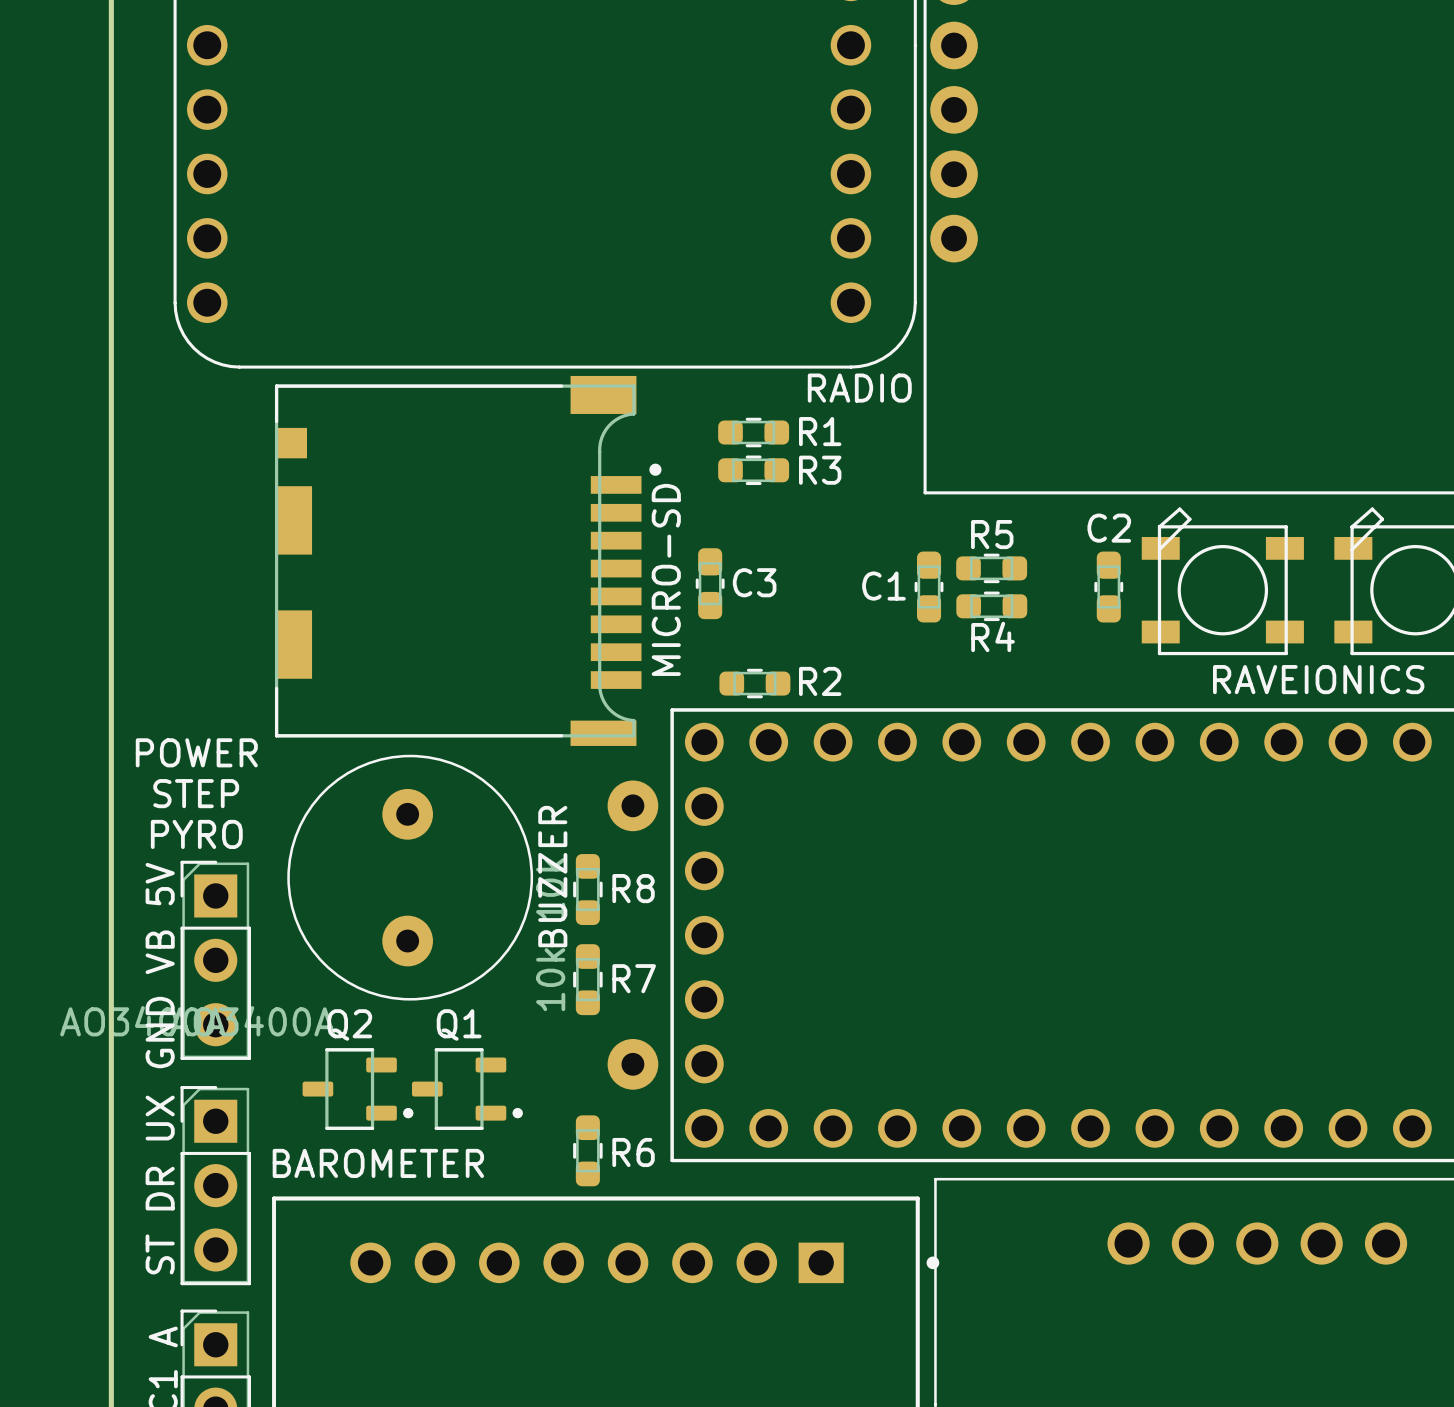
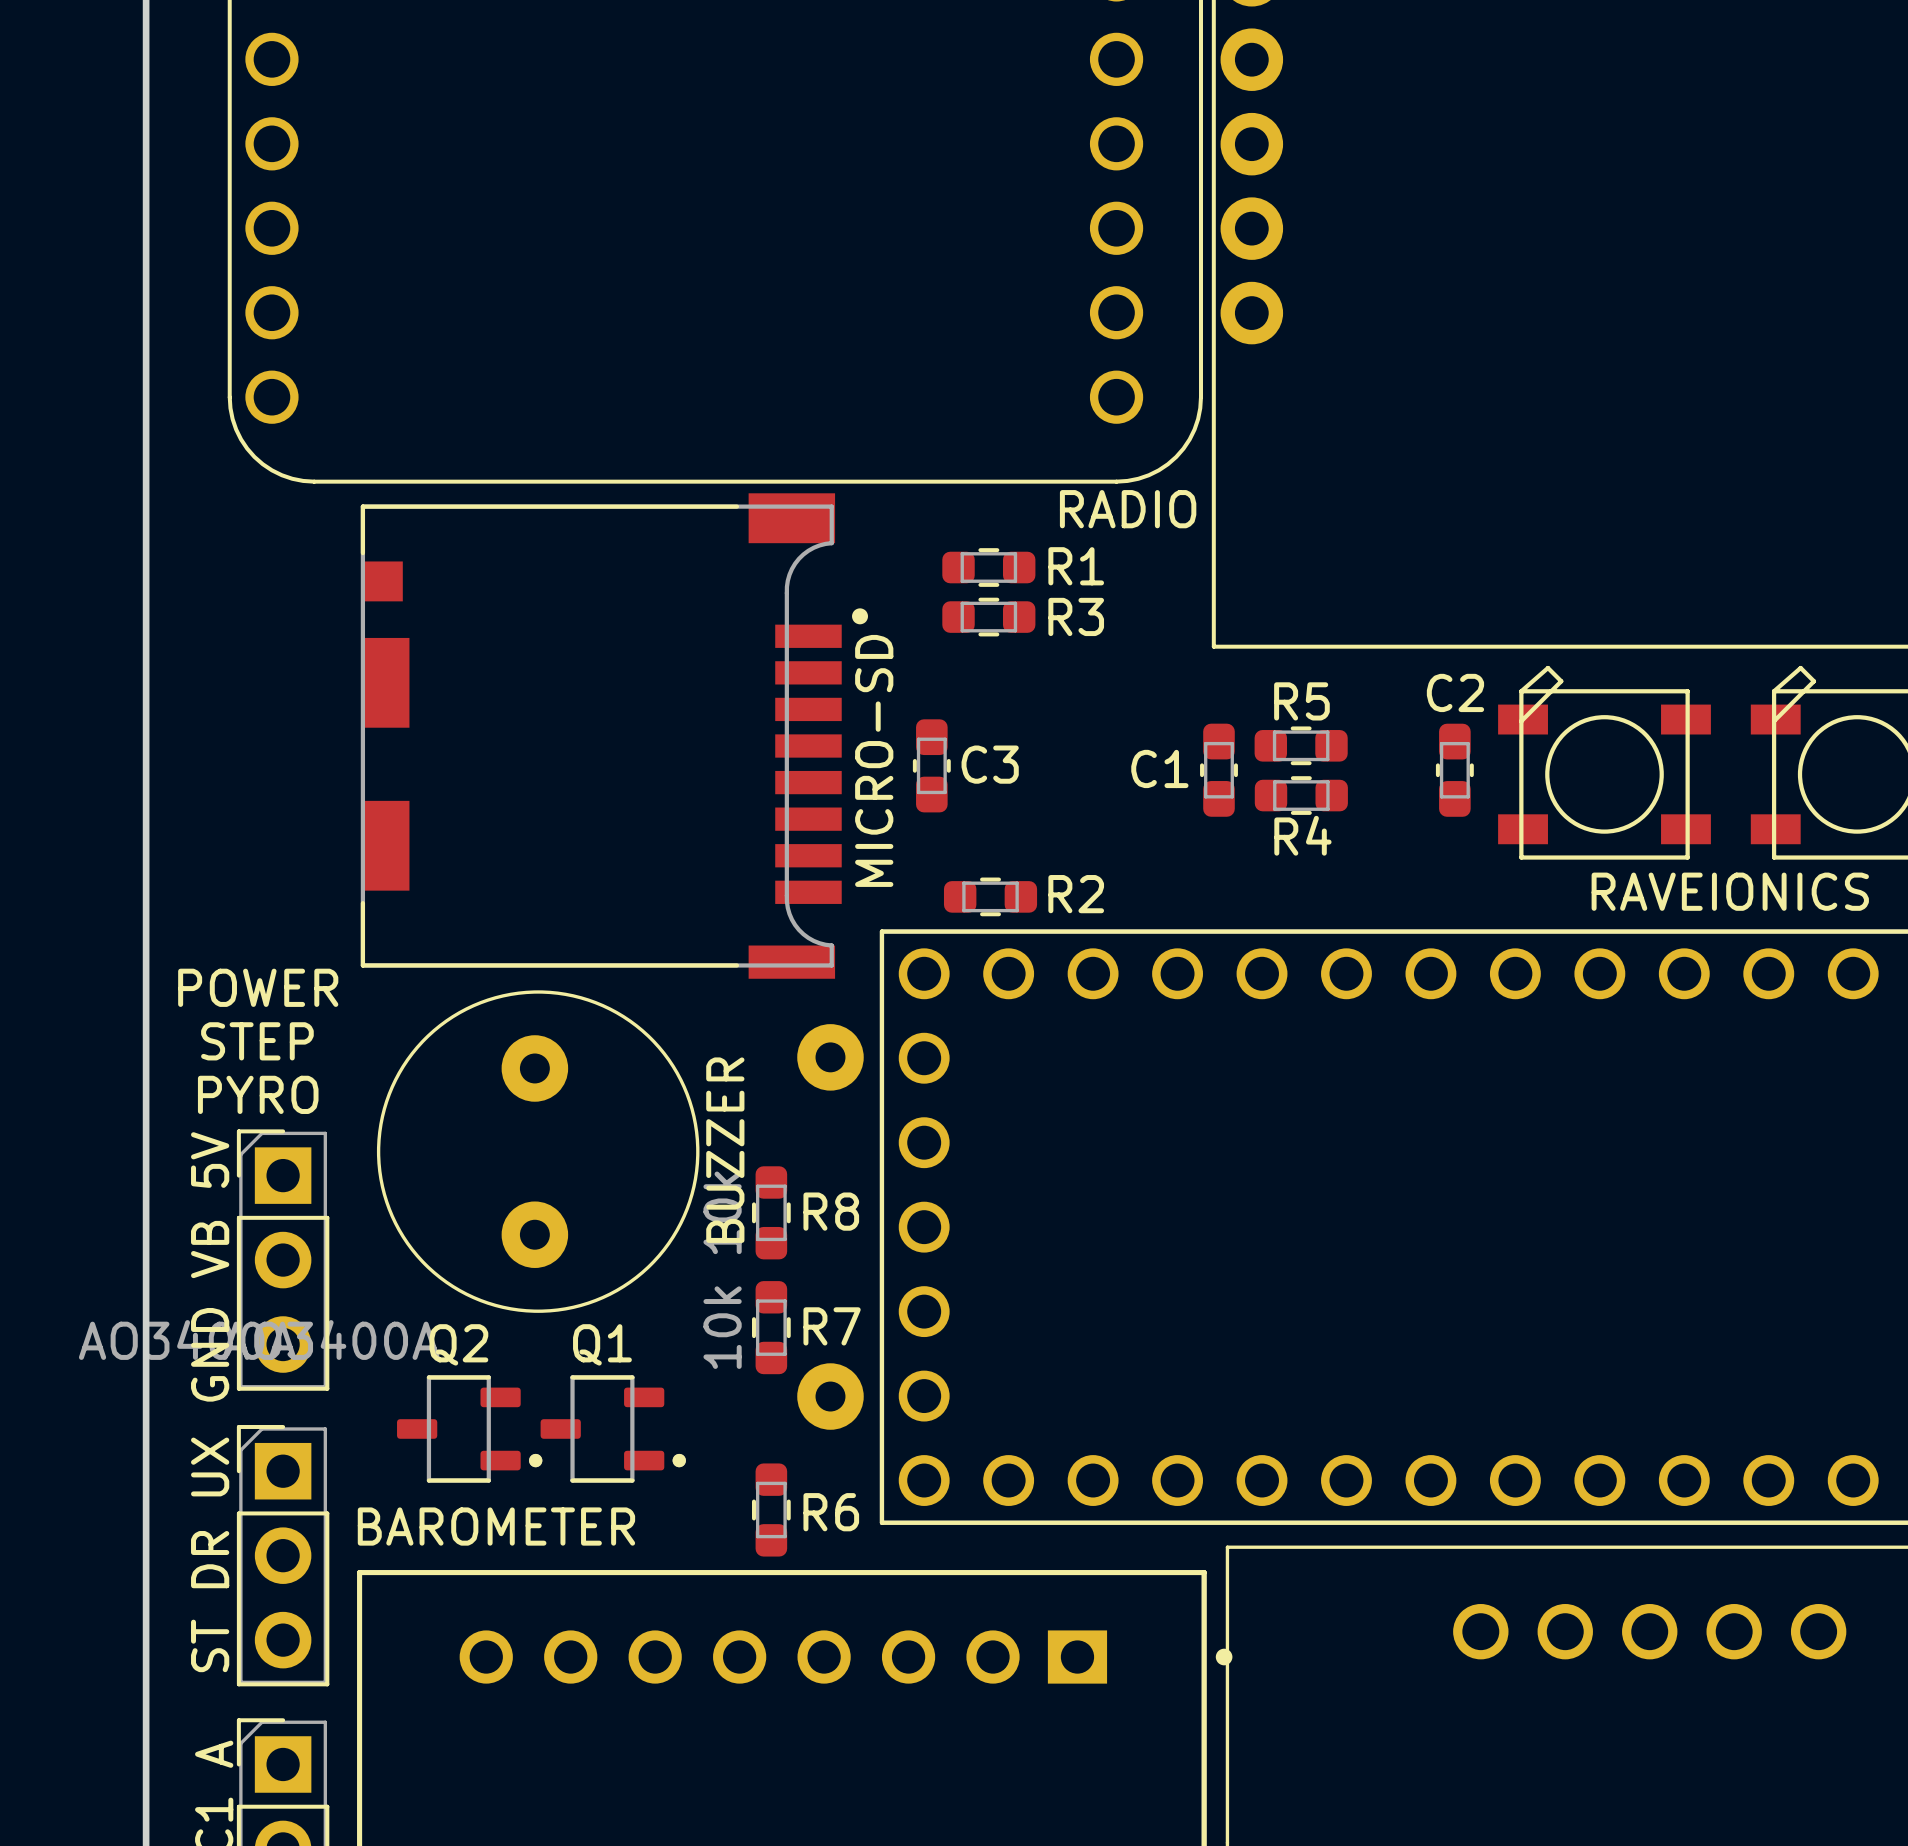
R8 position: (587, 889) -> (771, 1212)
R7 position: (587, 979) -> (771, 1327)

